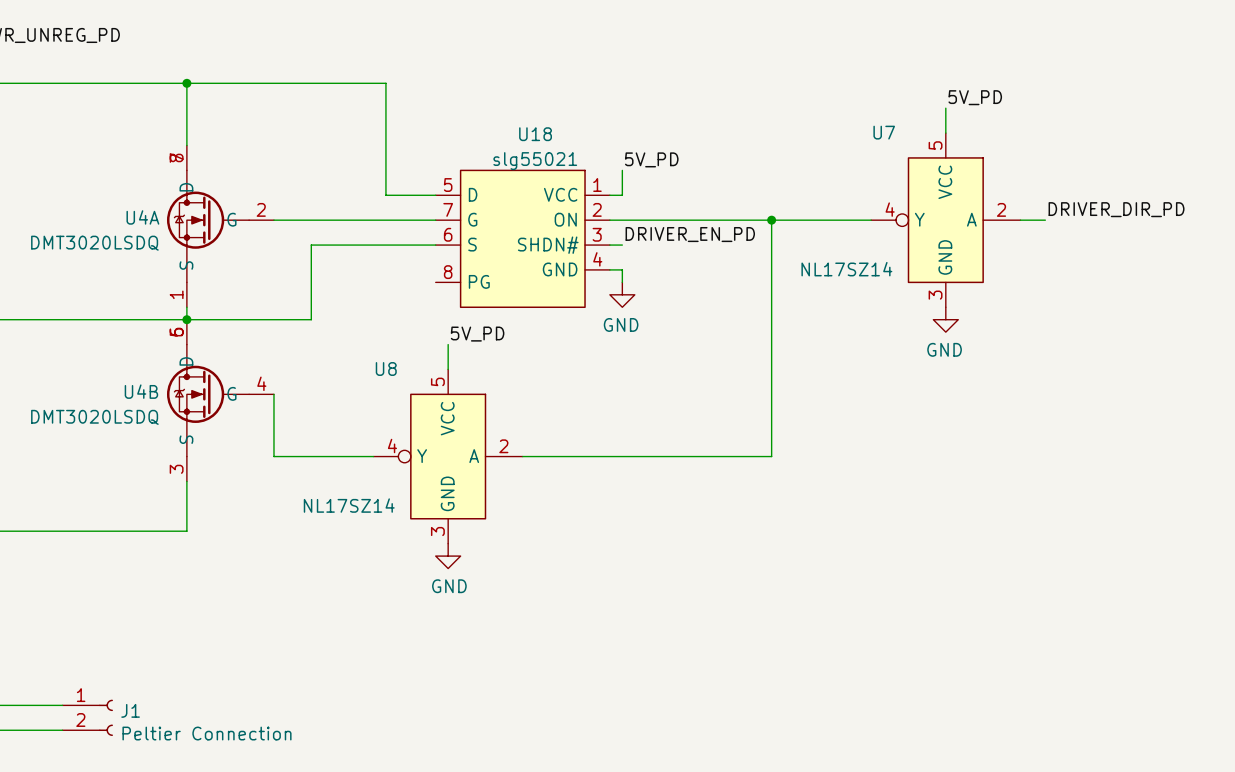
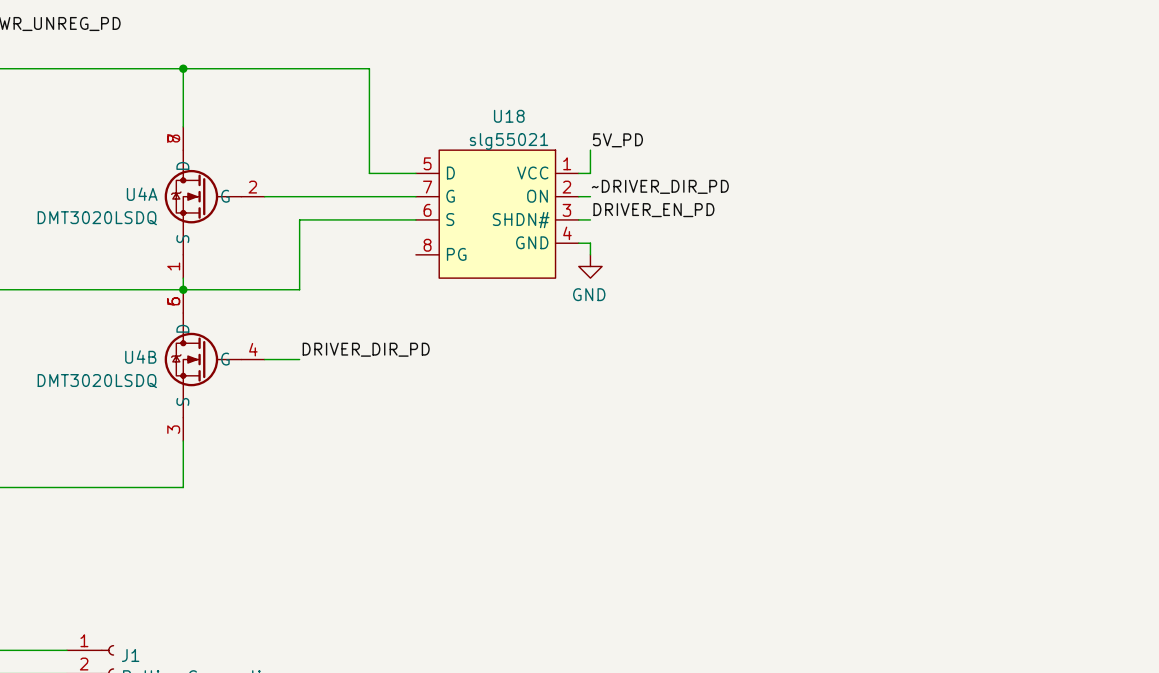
label: 5V_PD (975, 97) -> none
wire: (945, 108) (945, 133) -> none
label: none -> ~DRIVER_DIR_PD (660, 186)
label: DRIVER_DIR_PD (1116, 209) -> none
wire: (622, 220) (871, 220) -> none
wire: (771, 220) (771, 456) (522, 456) -> none
junction: (771, 220) -> none
U7: NL17SZ14 (945, 220) -> none
wire: (1020, 220) (1045, 220) -> none
power symbol: GND (945, 319) -> none
label: 5V_PD (477, 334) -> none
wire: (448, 344) (448, 369) -> none
label: none -> DRIVER_DIR_PD (366, 349)
wire: (273, 394) (273, 456) (373, 456) -> (264, 359) (299, 359)
U8: NL17SZ14 (448, 456) -> none
power symbol: GND (448, 556) -> none

